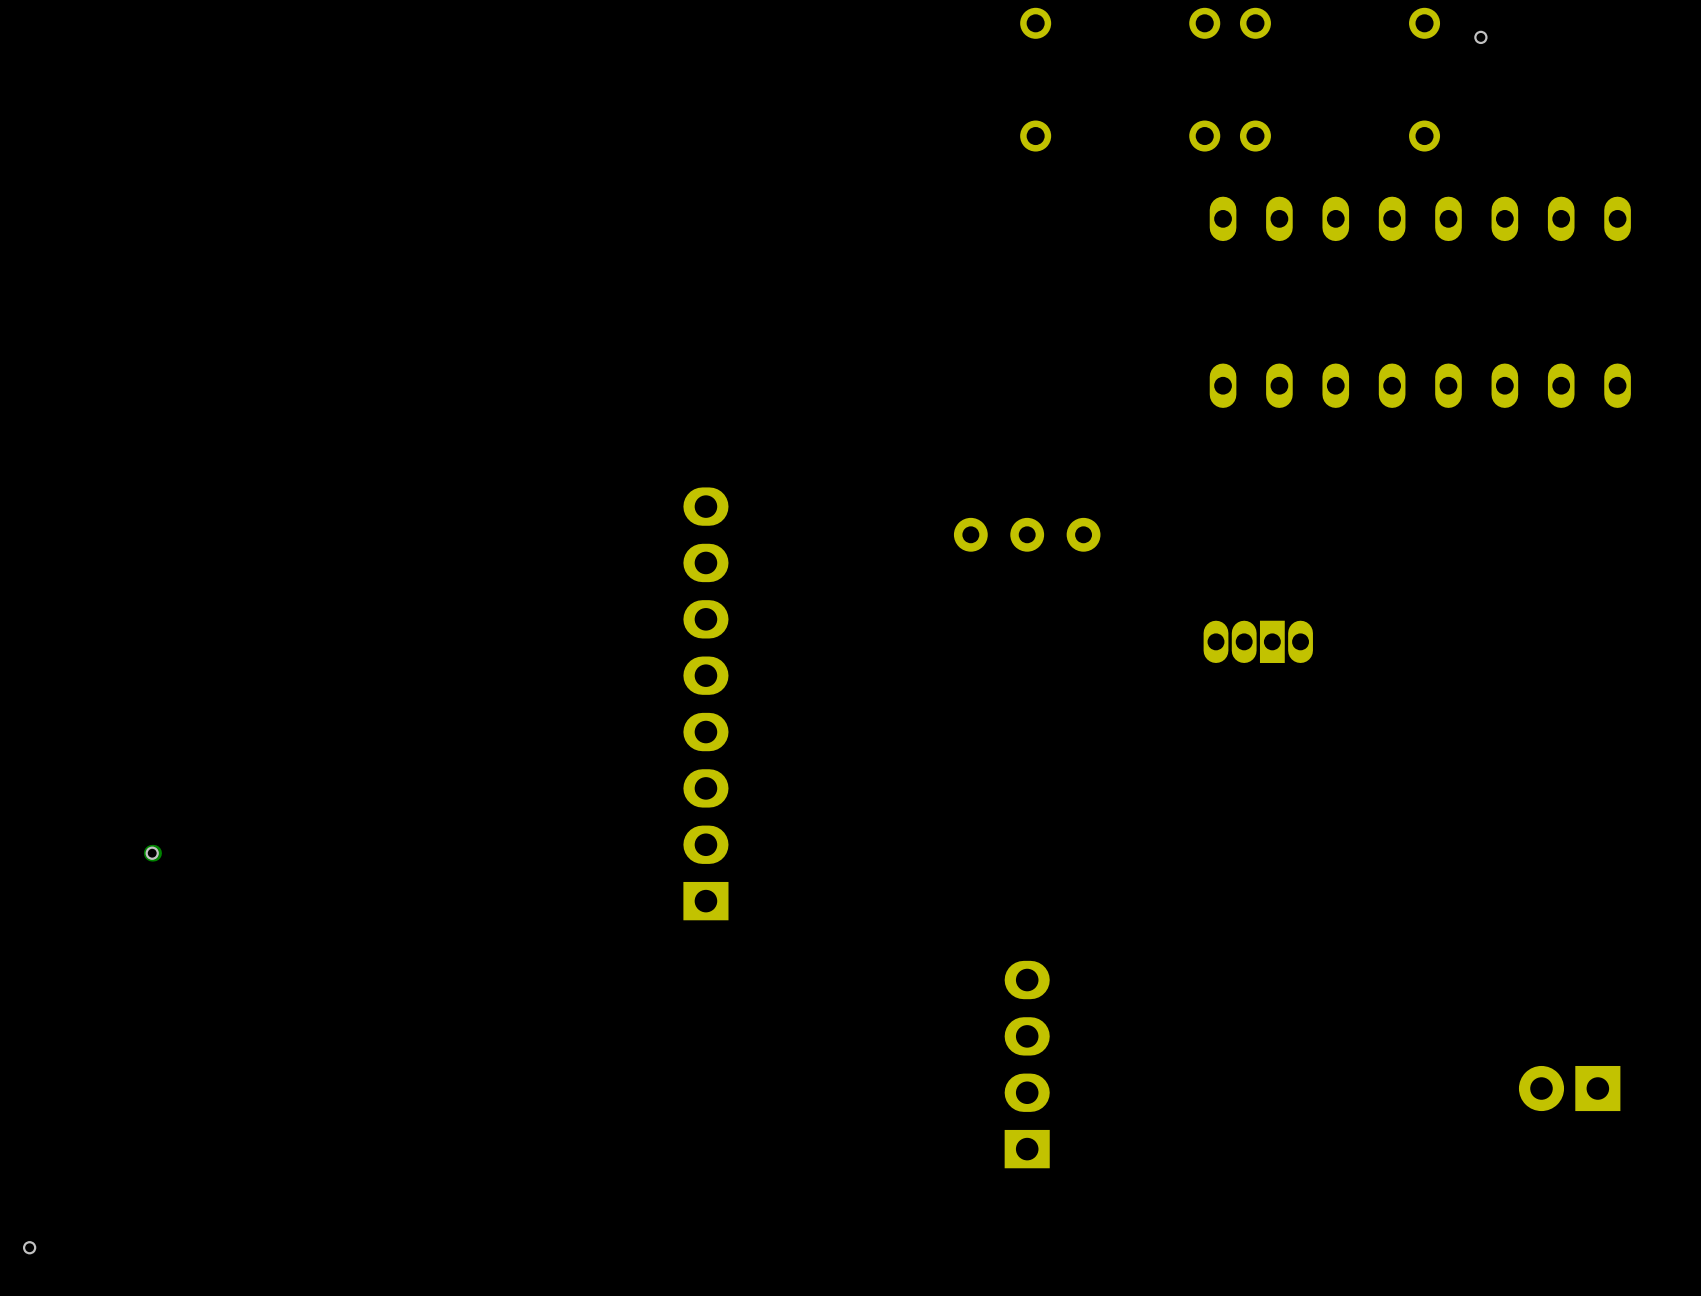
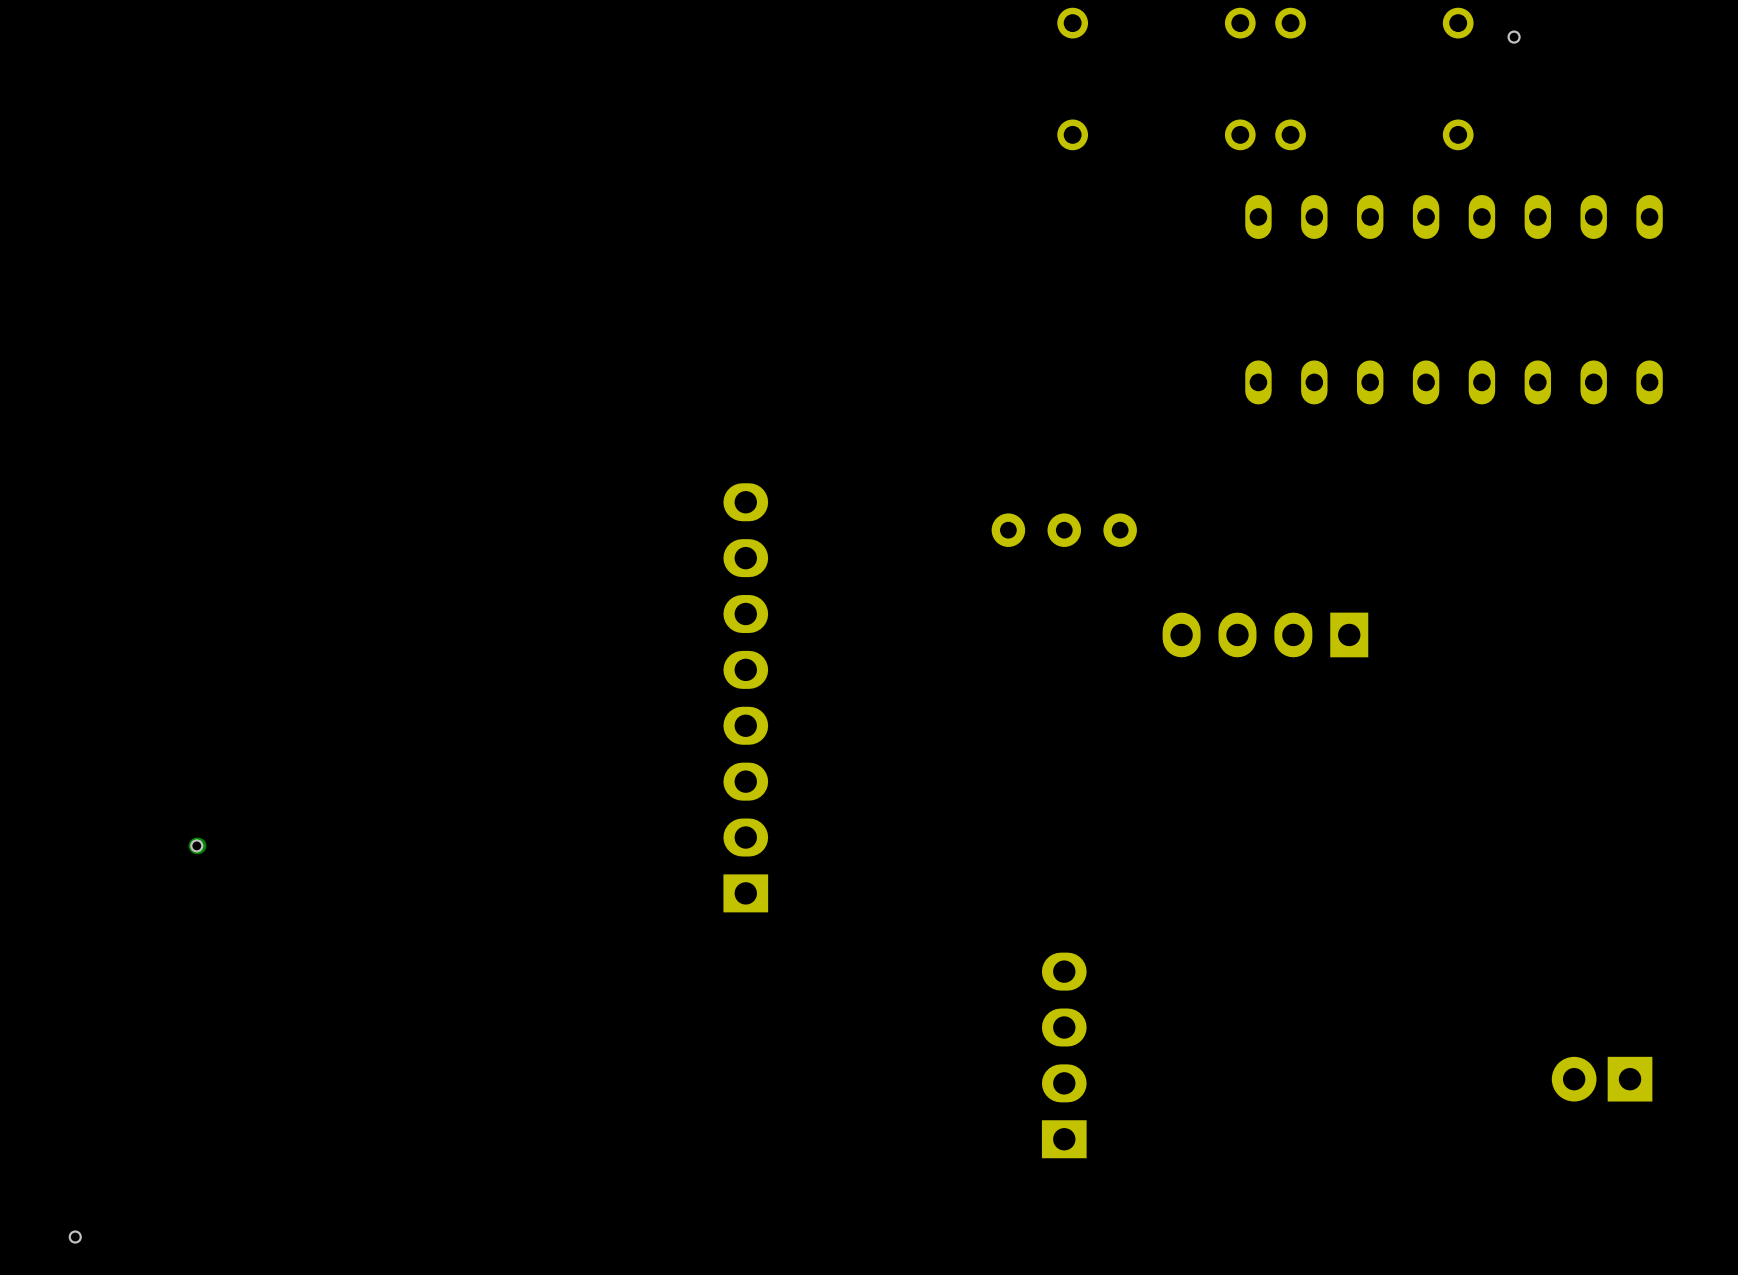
part: none -> (1265, 634)
part: (1258, 641) -> none

